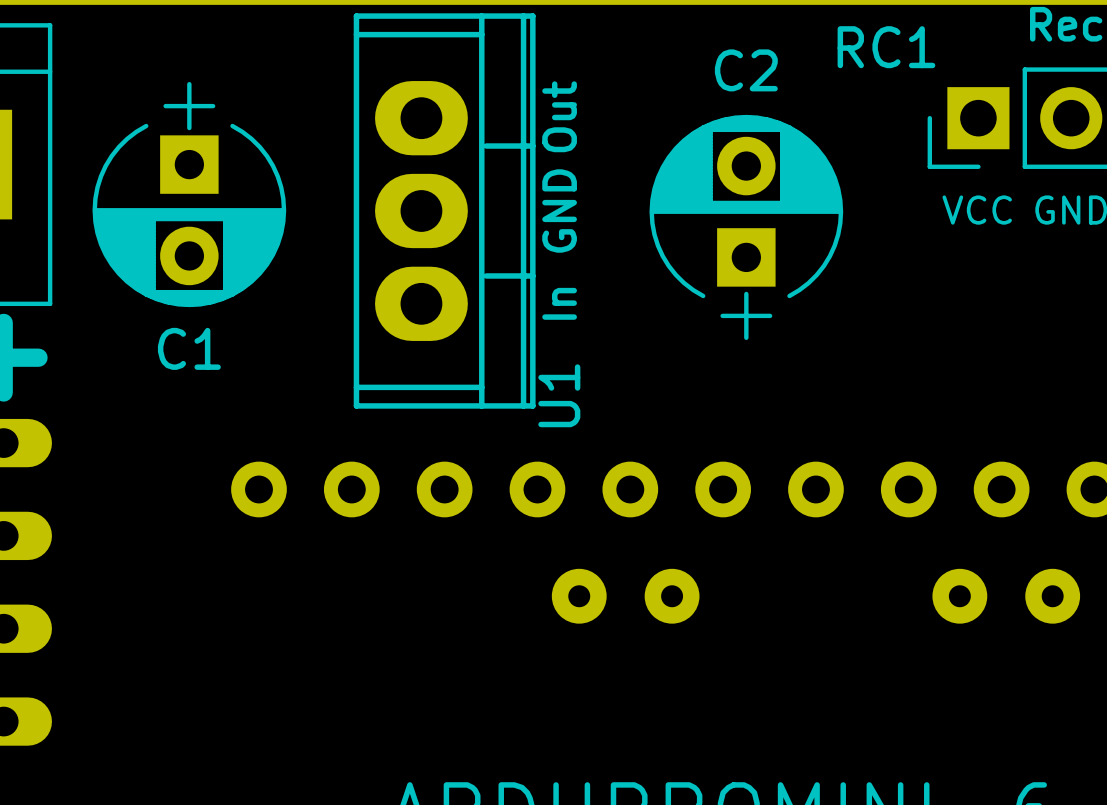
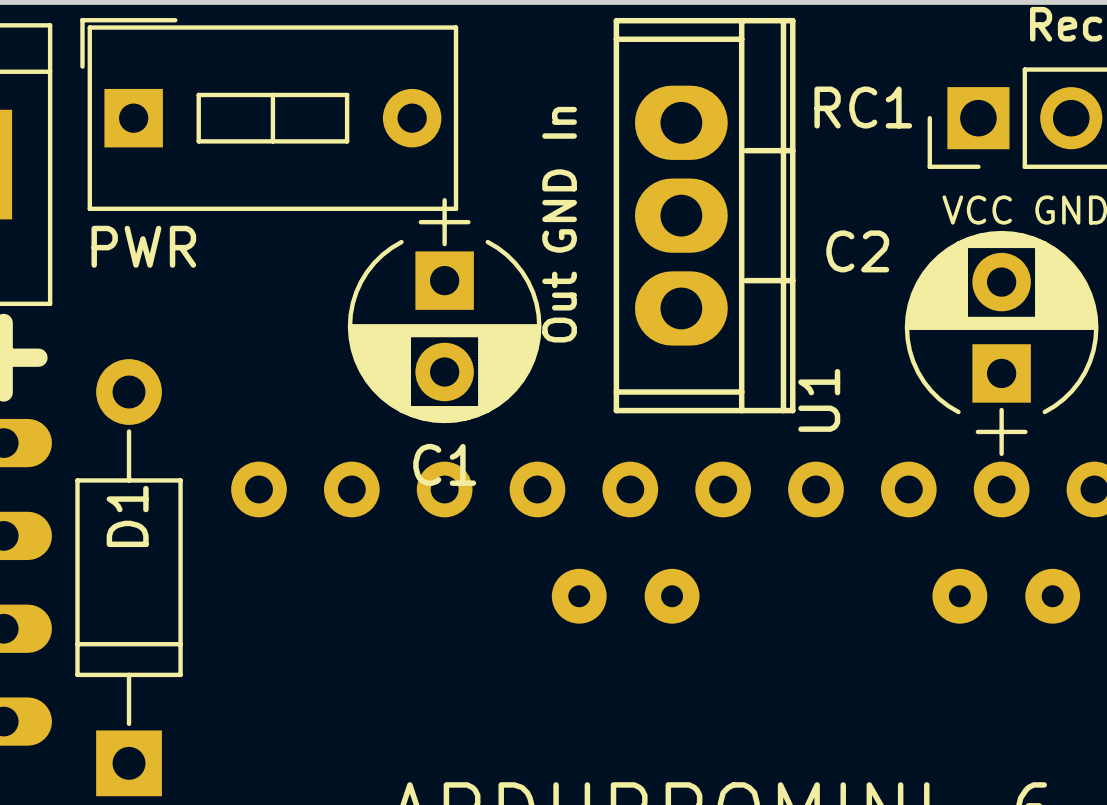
RC1 name position: RC1 (886, 47) -> RC1 (863, 107)
C2 name position: C2 (746, 70) -> C2 (857, 251)
PWR: none -> (269, 114)
text position: Out (559, 116) -> Out (559, 307)
C1 position: (189, 194) -> (444, 310)
U1 position: (444, 211) -> (704, 215)
C2 position: (746, 227) -> (1001, 343)
text position: In (559, 303) -> In (559, 122)
D1: none -> (129, 577)

